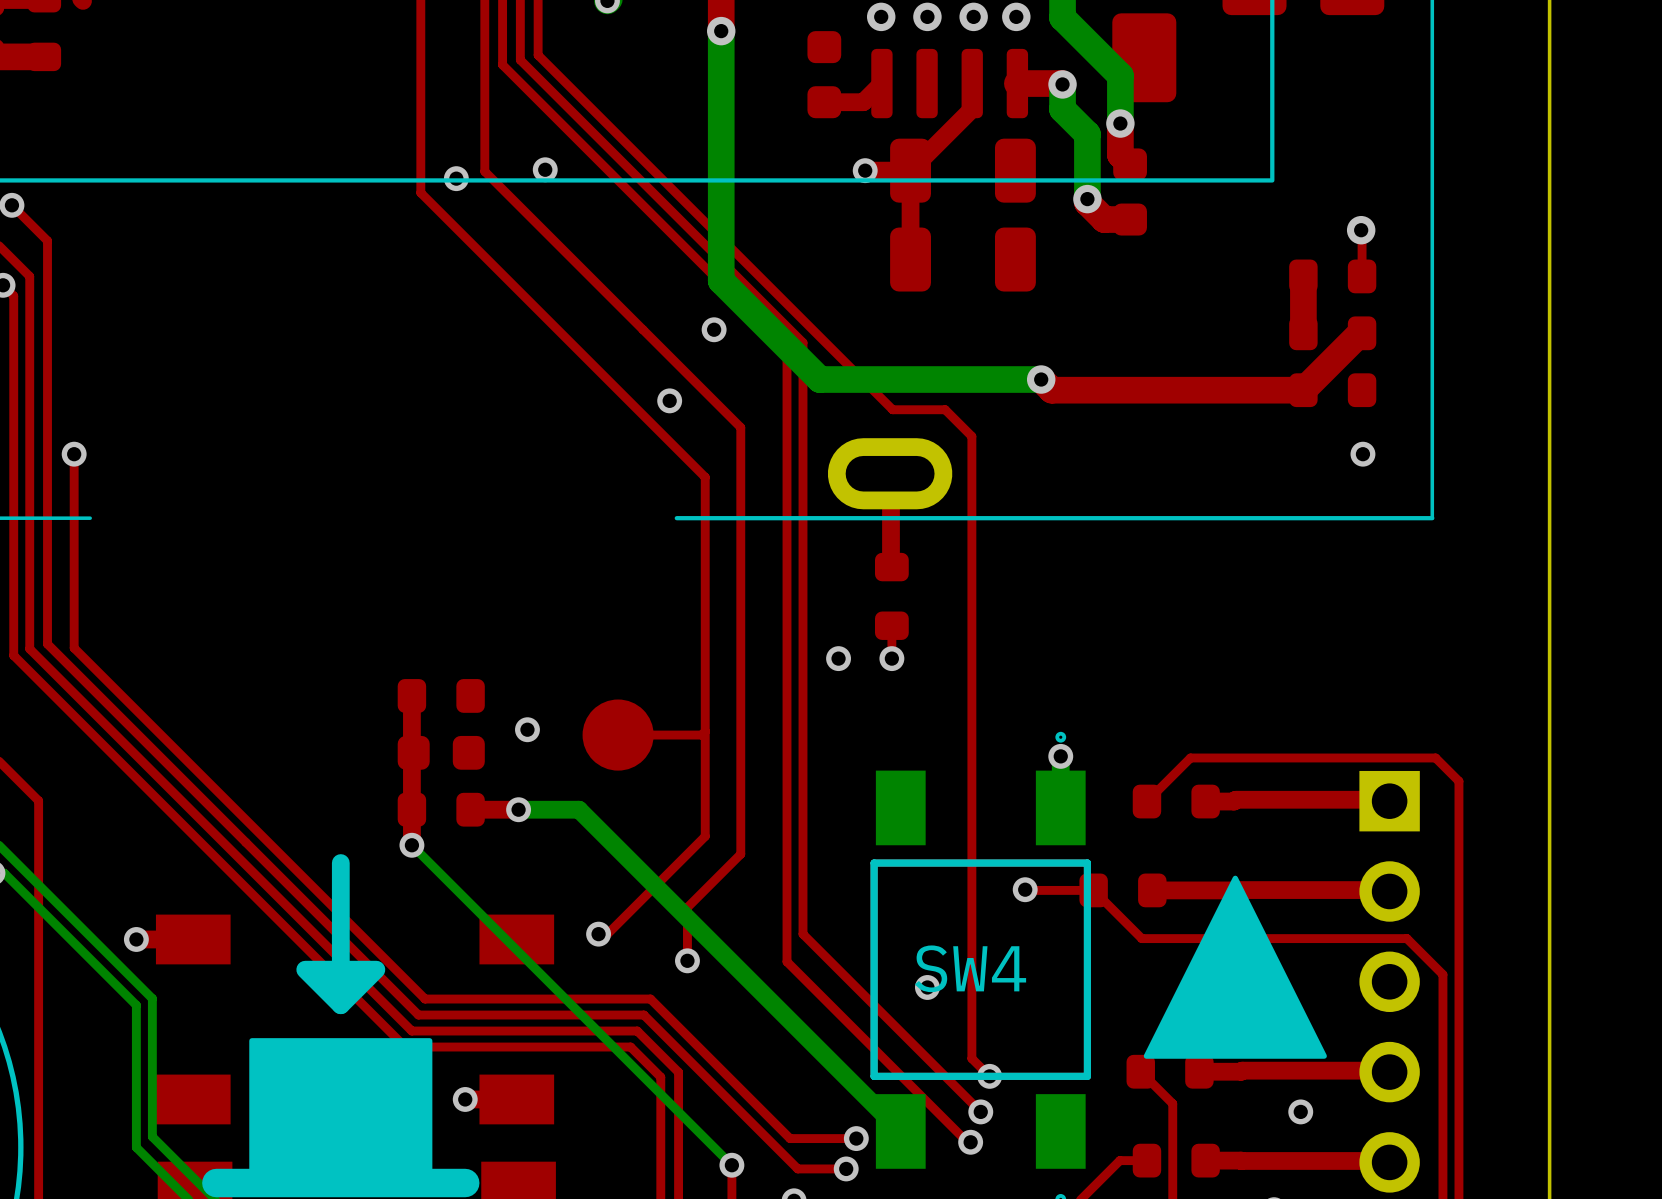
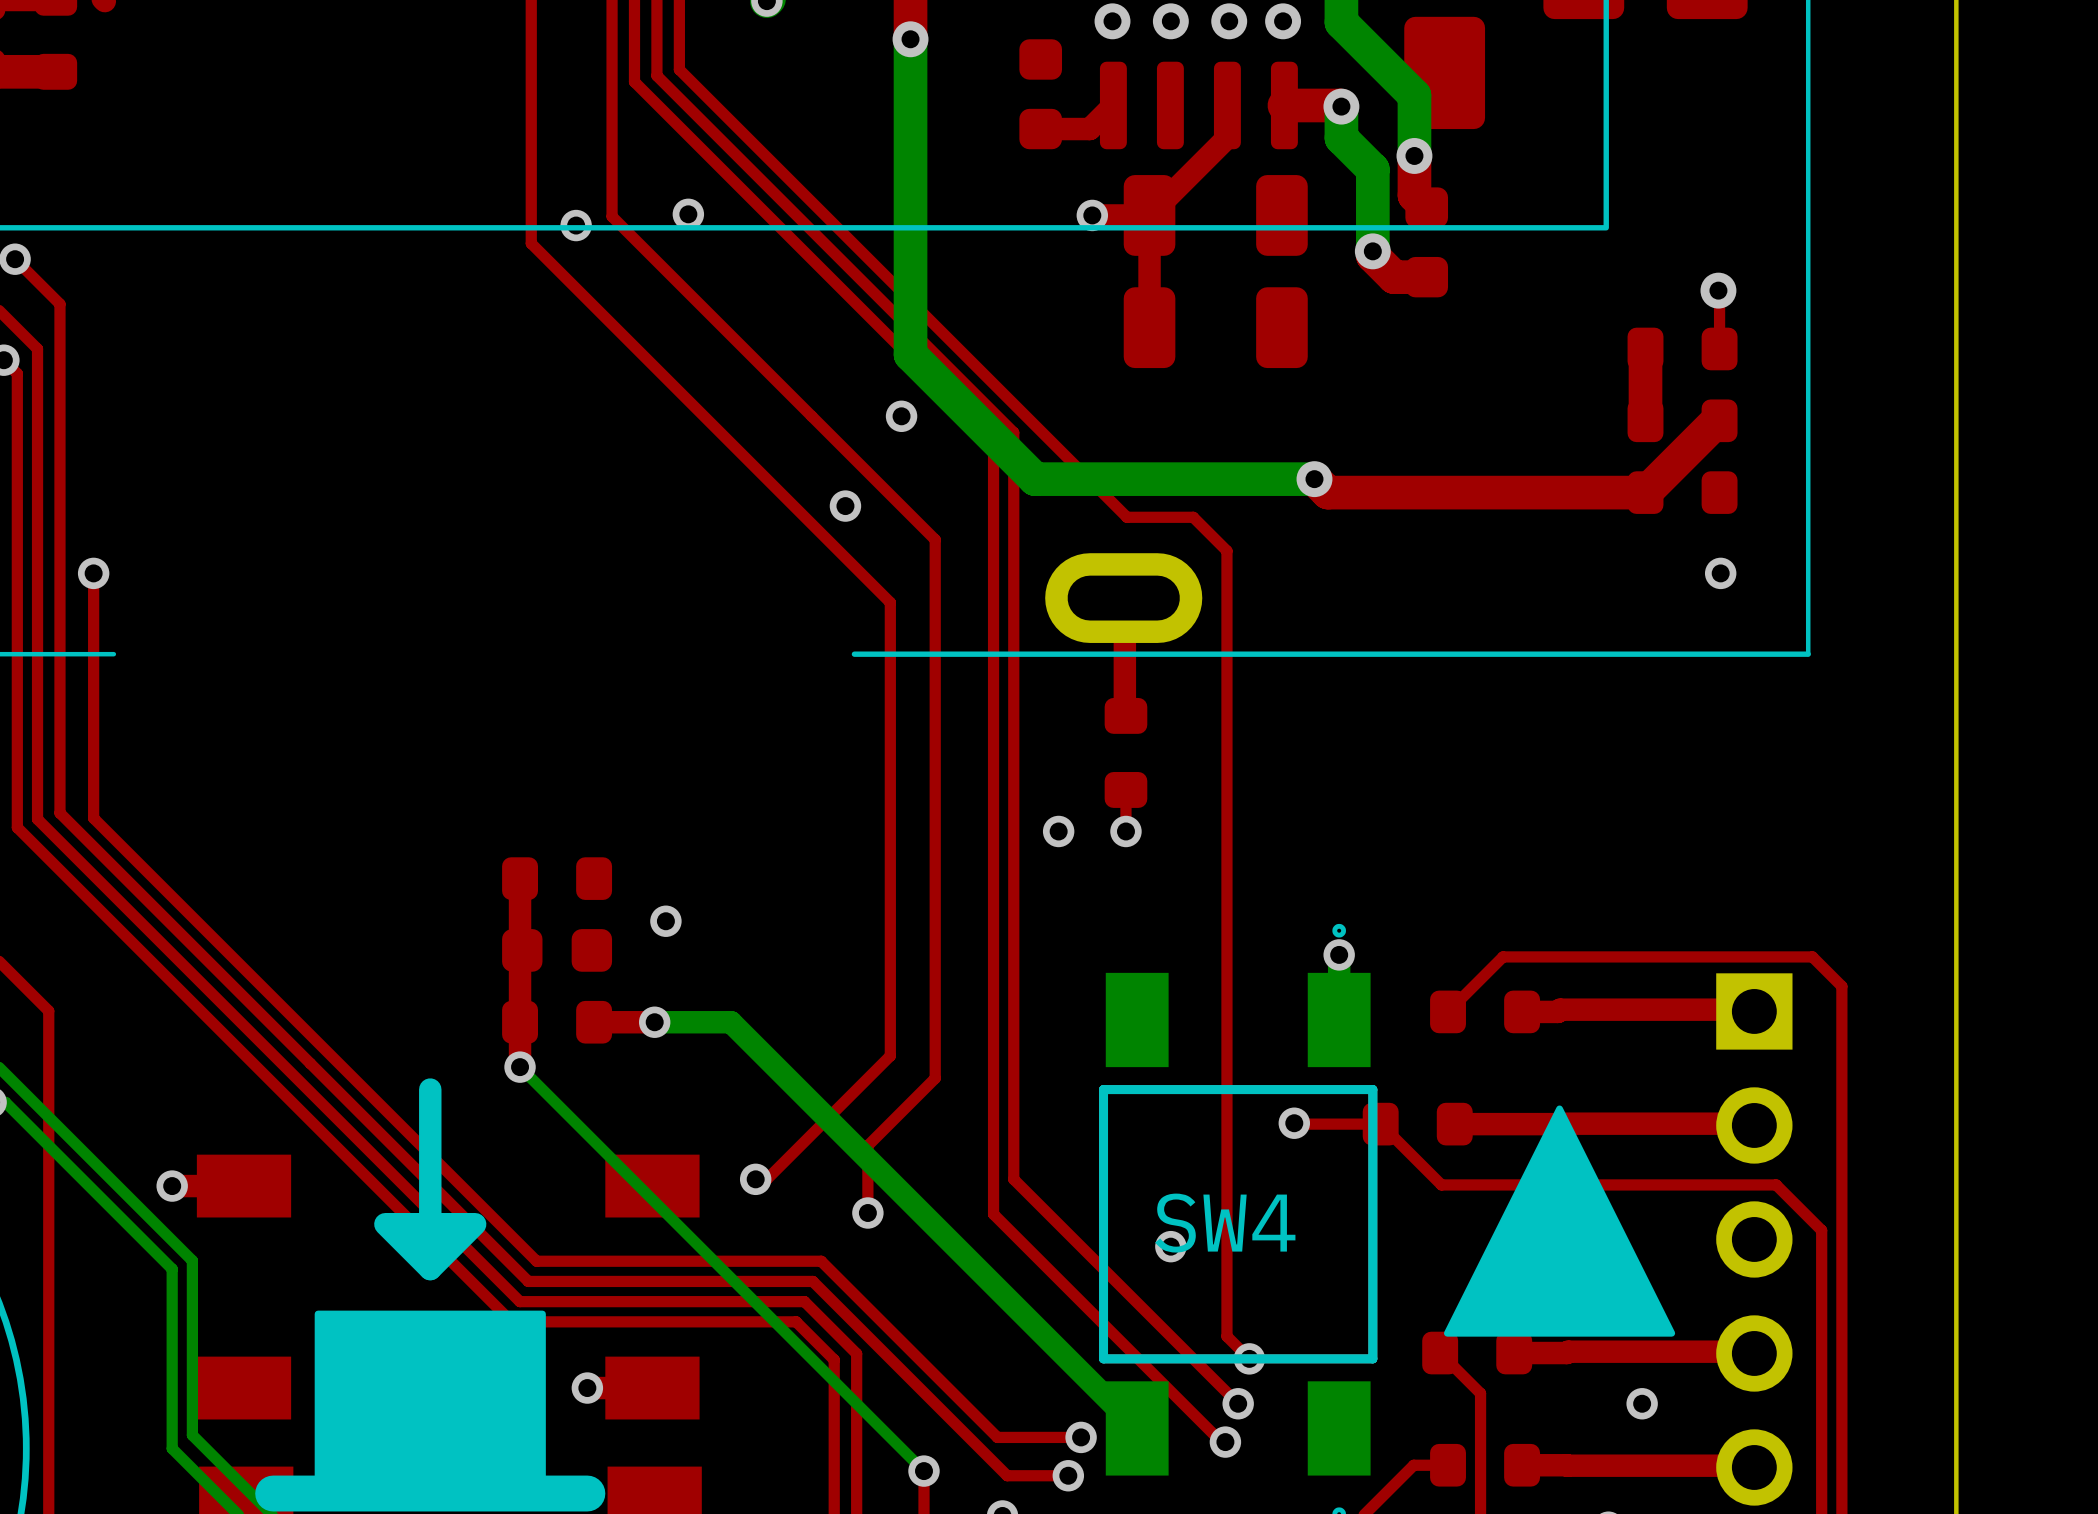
top track: (705, 731) (701, 735) (618, 735) -> none
part: (618, 735) -> none

